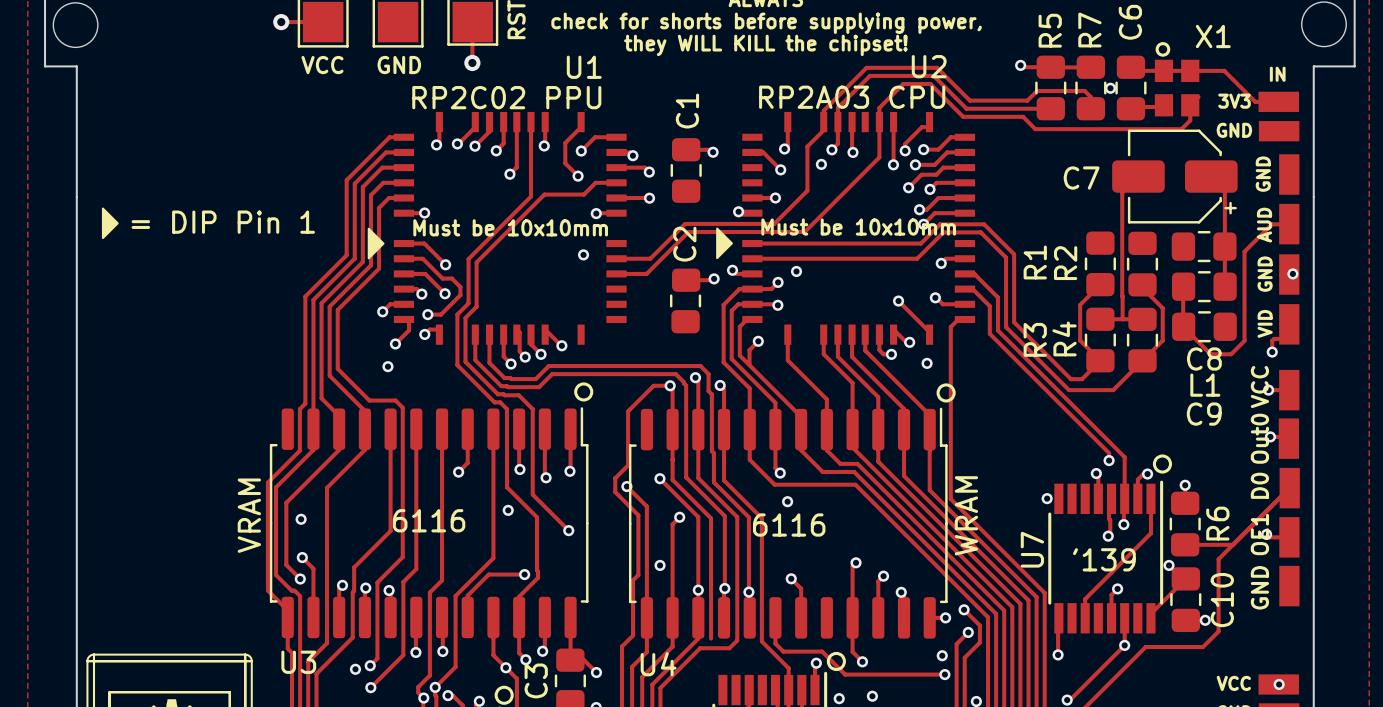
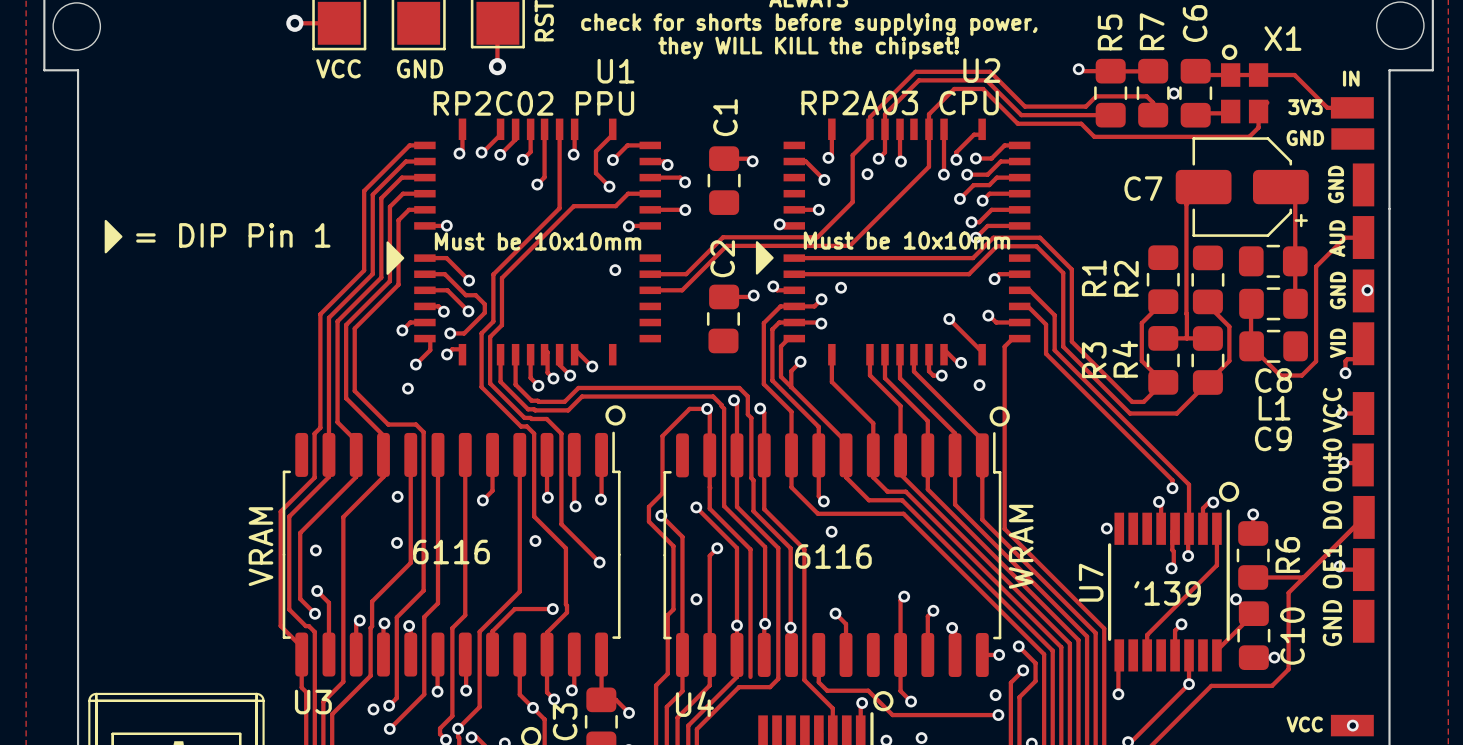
via: none -> (397, 496)
via: none -> (397, 542)

